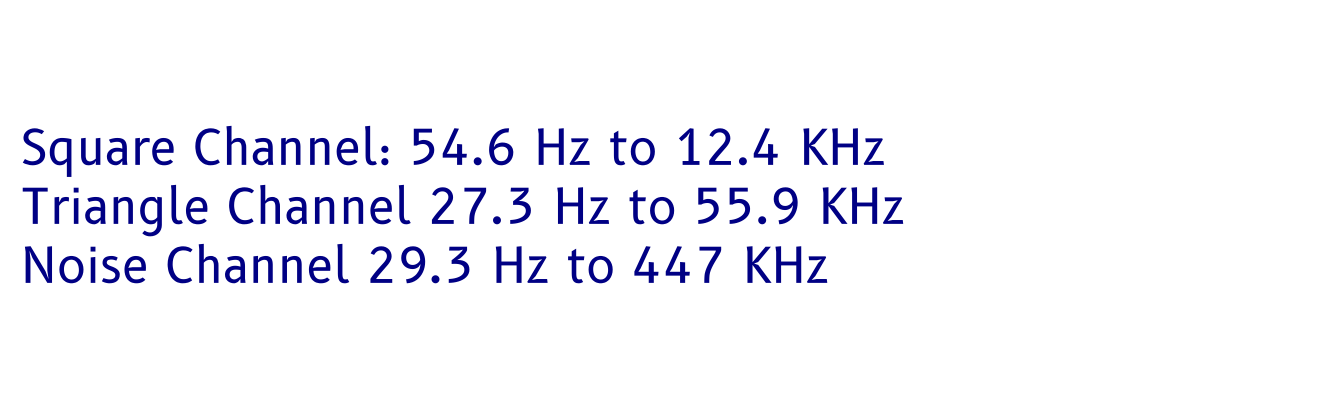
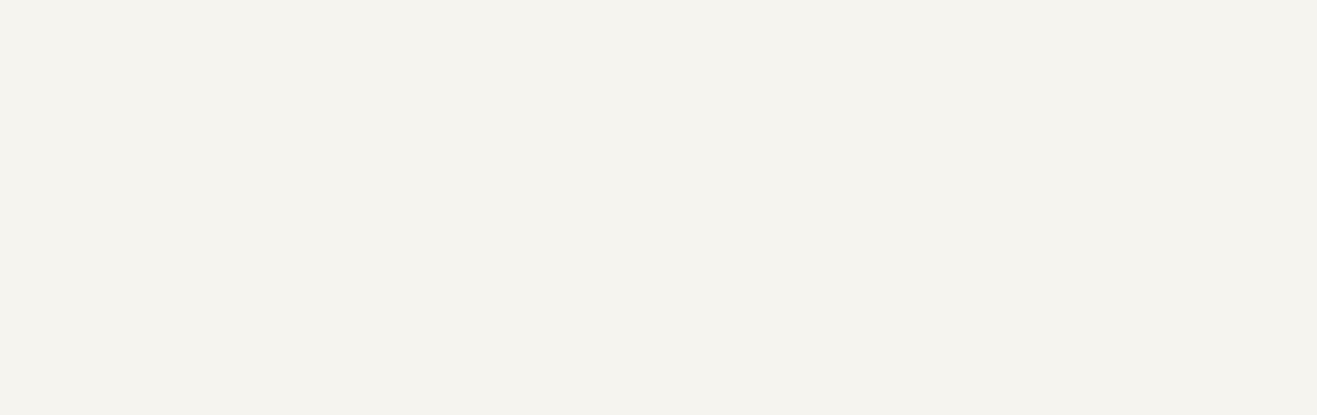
text: Square Channel: 54.6 Hz to 12.4 KHz (453, 151) -> none
text: Triangle Channel 27.3 Hz to 55.9 KHz (462, 210) -> none
text: Noise Channel 29.3 Hz to 447 KHz (426, 263) -> none

